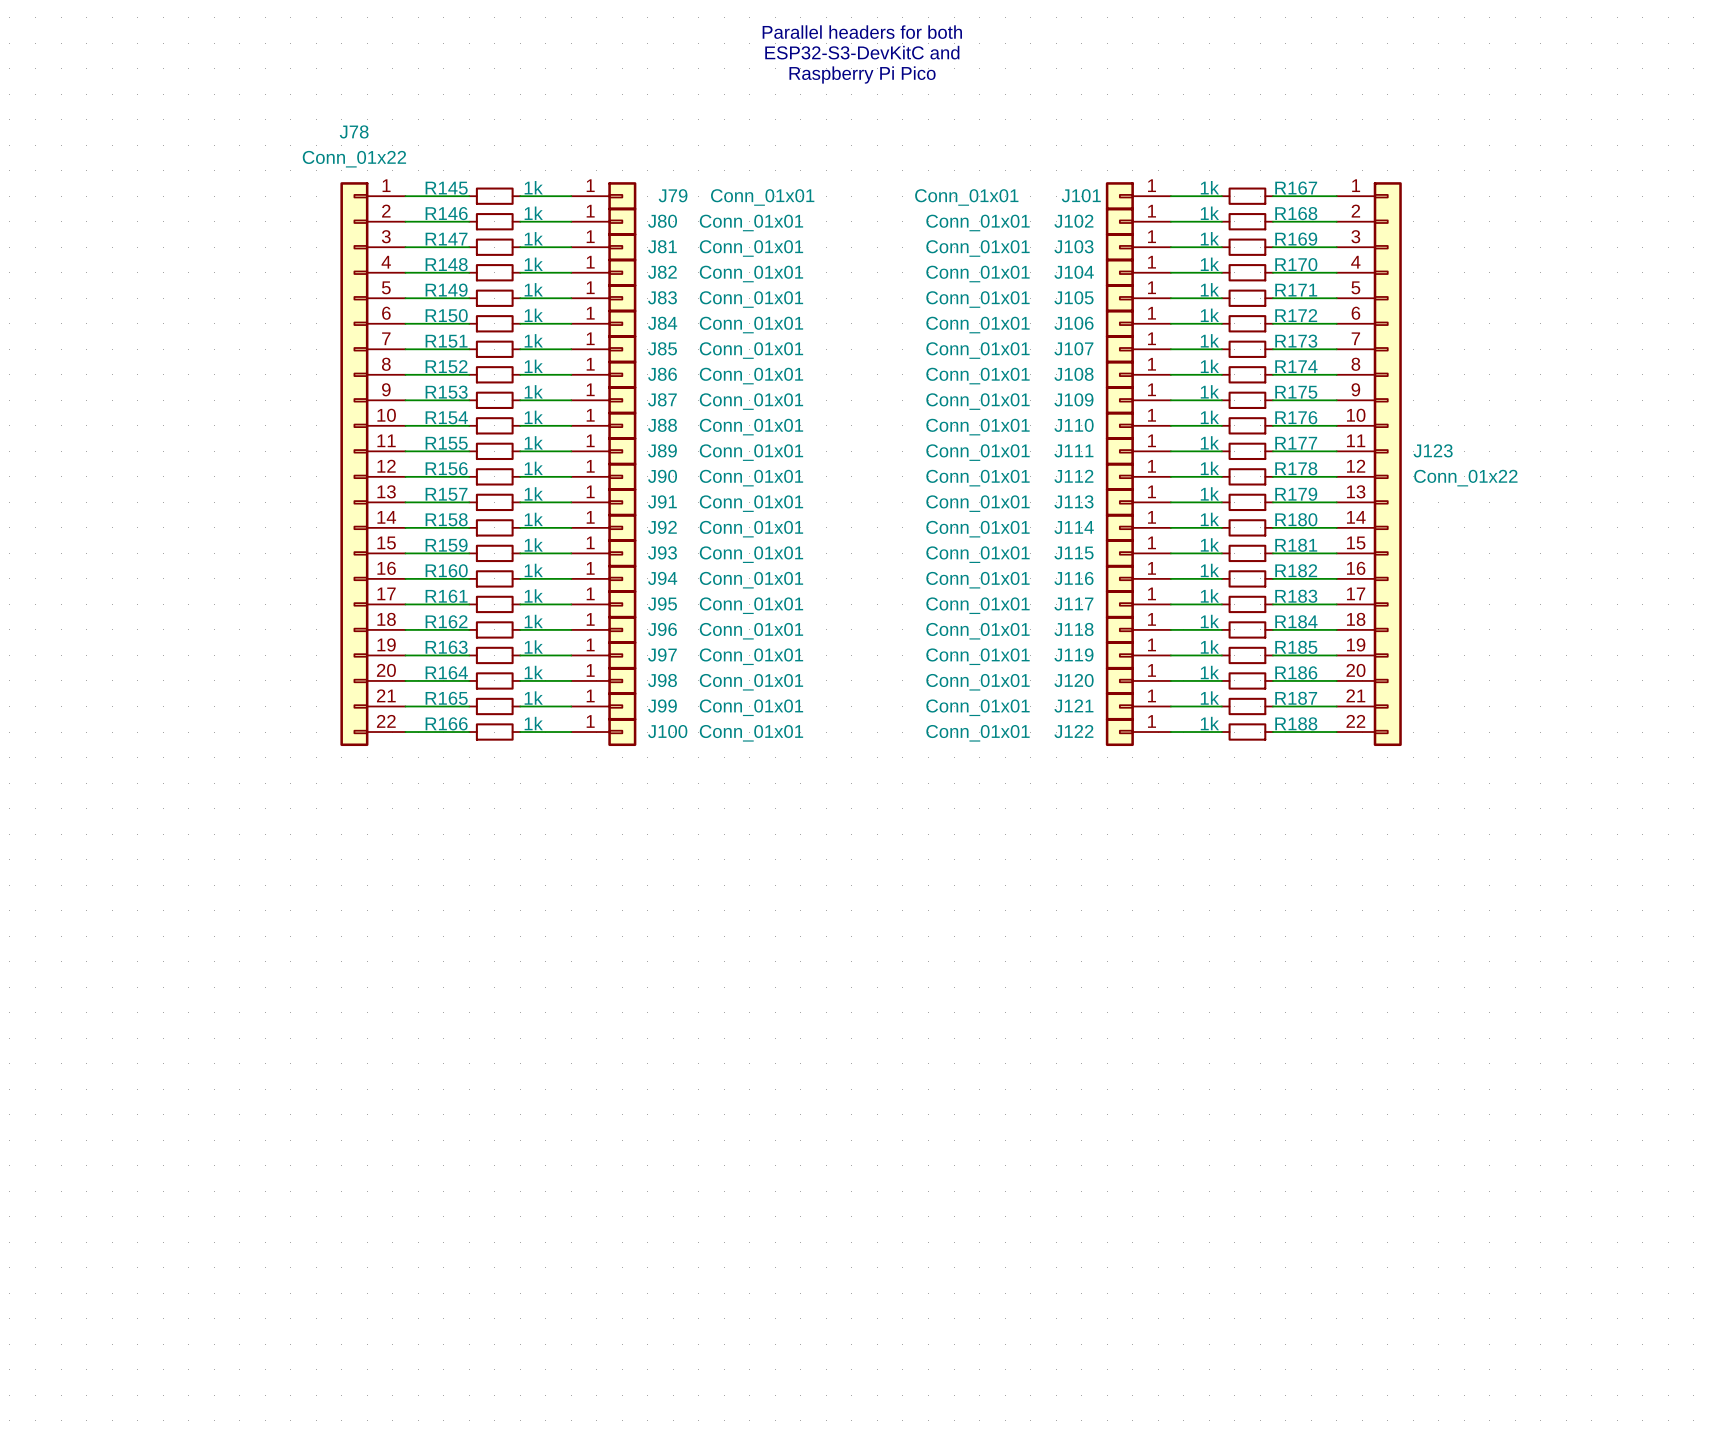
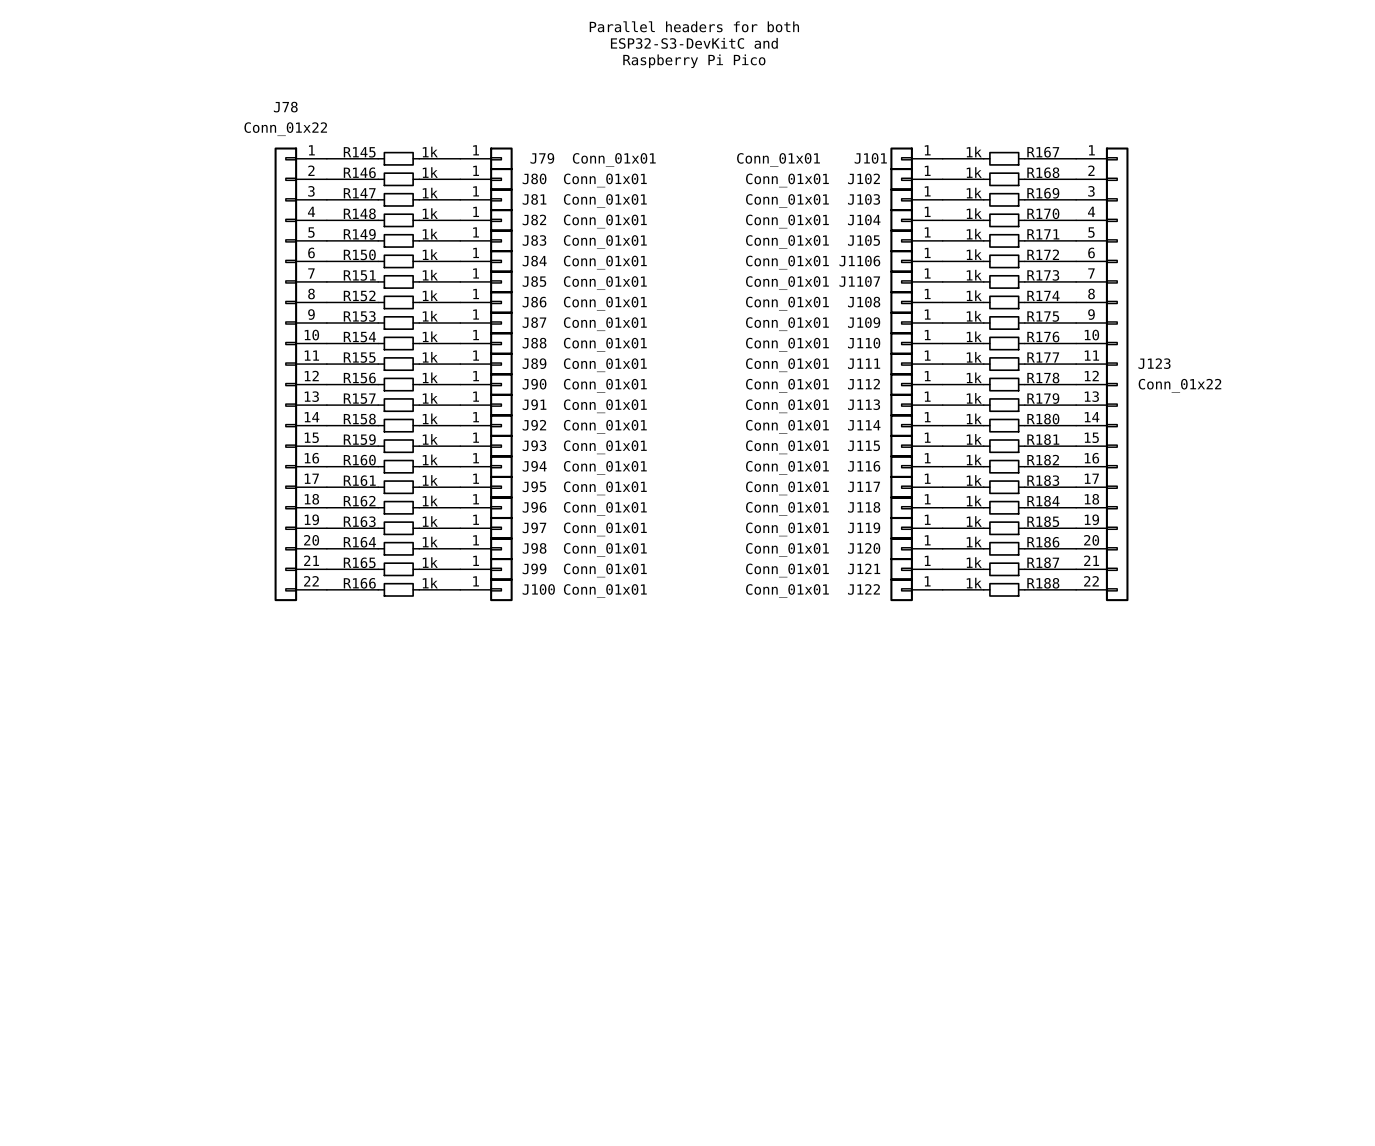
J106 name: J106 (1073, 323) -> J1106 (859, 261)
J107 name: J107 (1073, 348) -> J1107 (859, 281)

